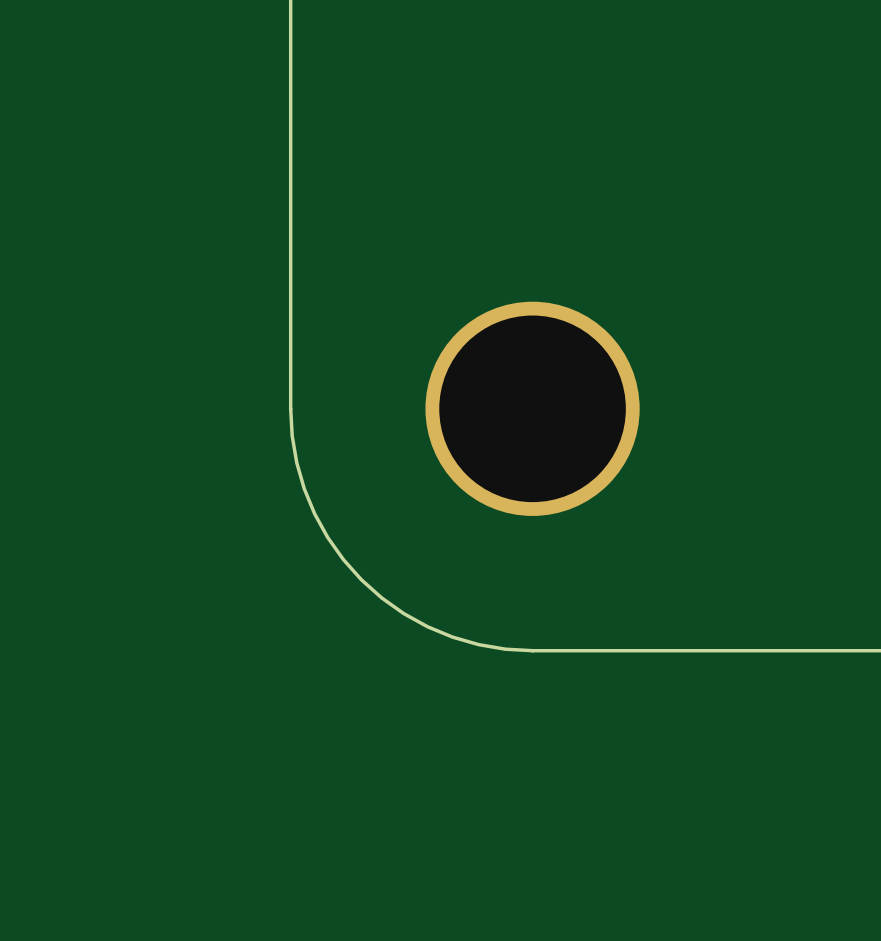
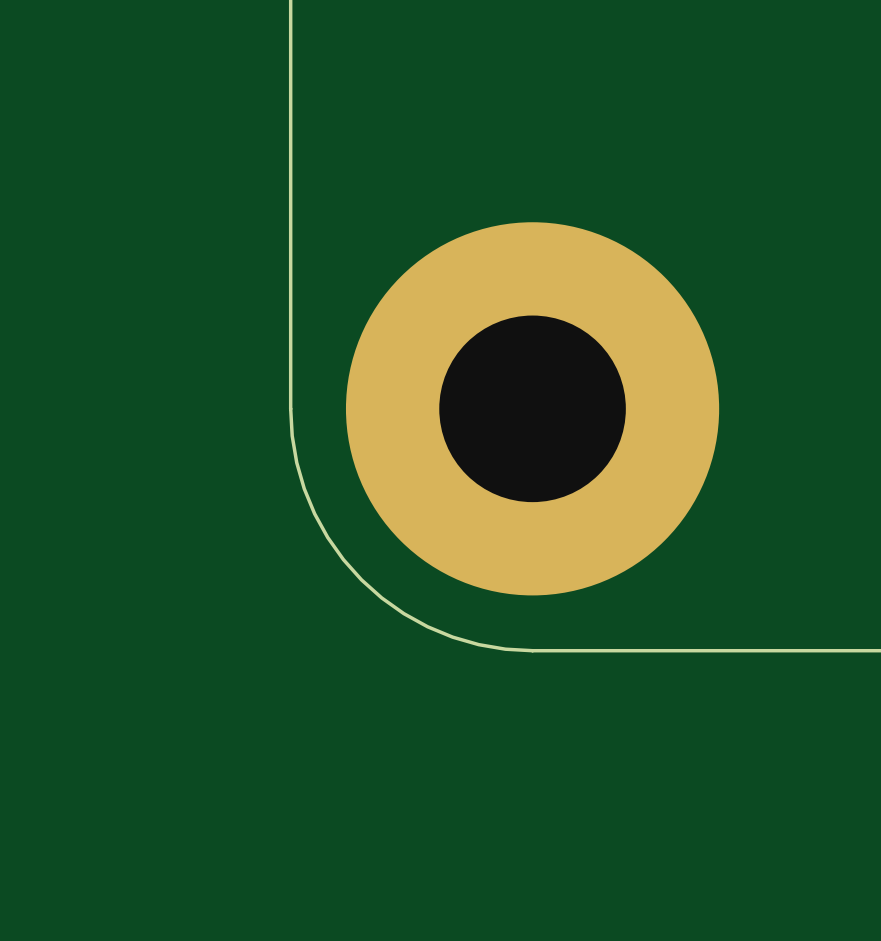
part footprint: [425, 301, 640, 516] -> [345, 222, 720, 596]

